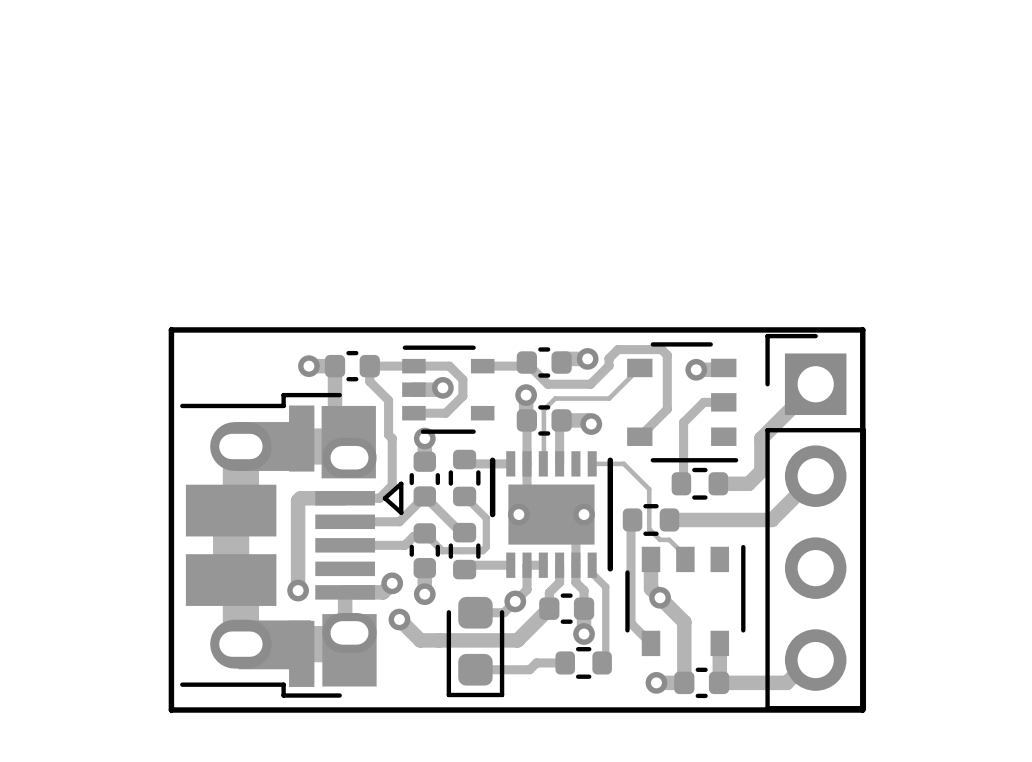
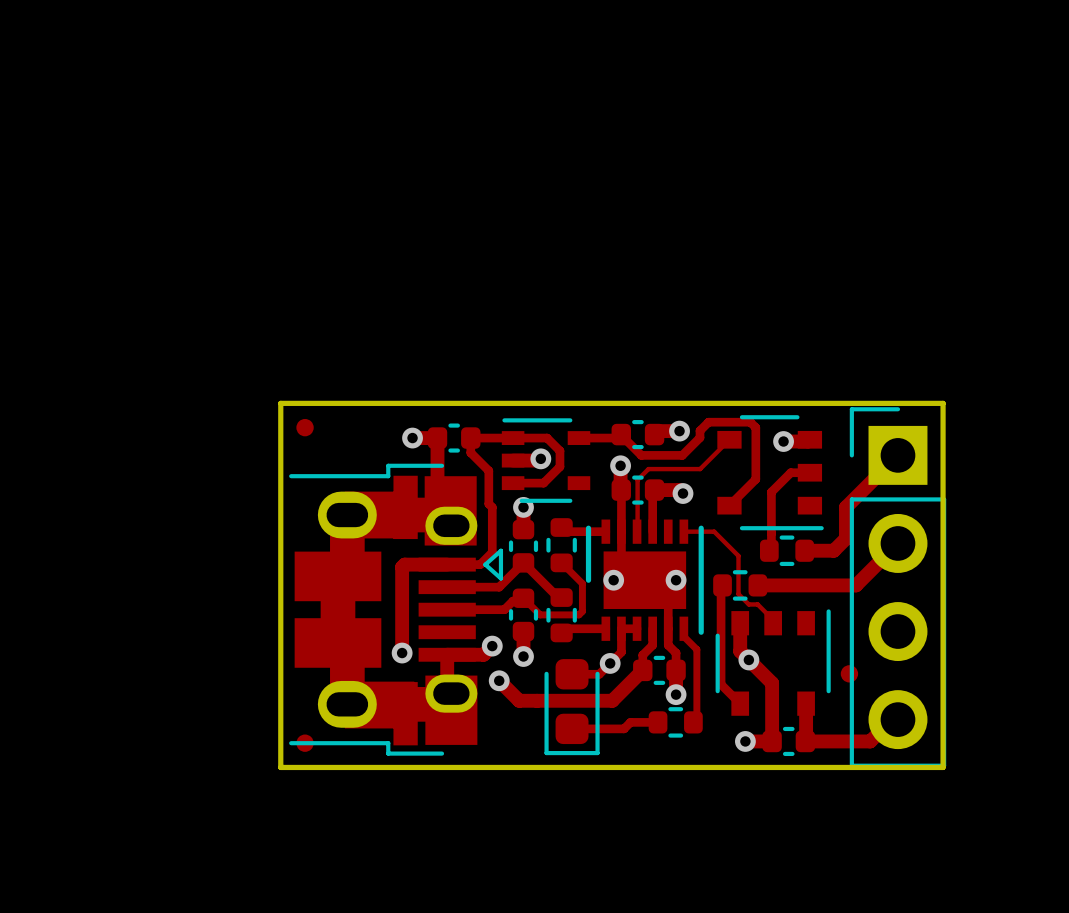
part: none -> (305, 427)
part: none -> (849, 673)
part: none -> (305, 743)

